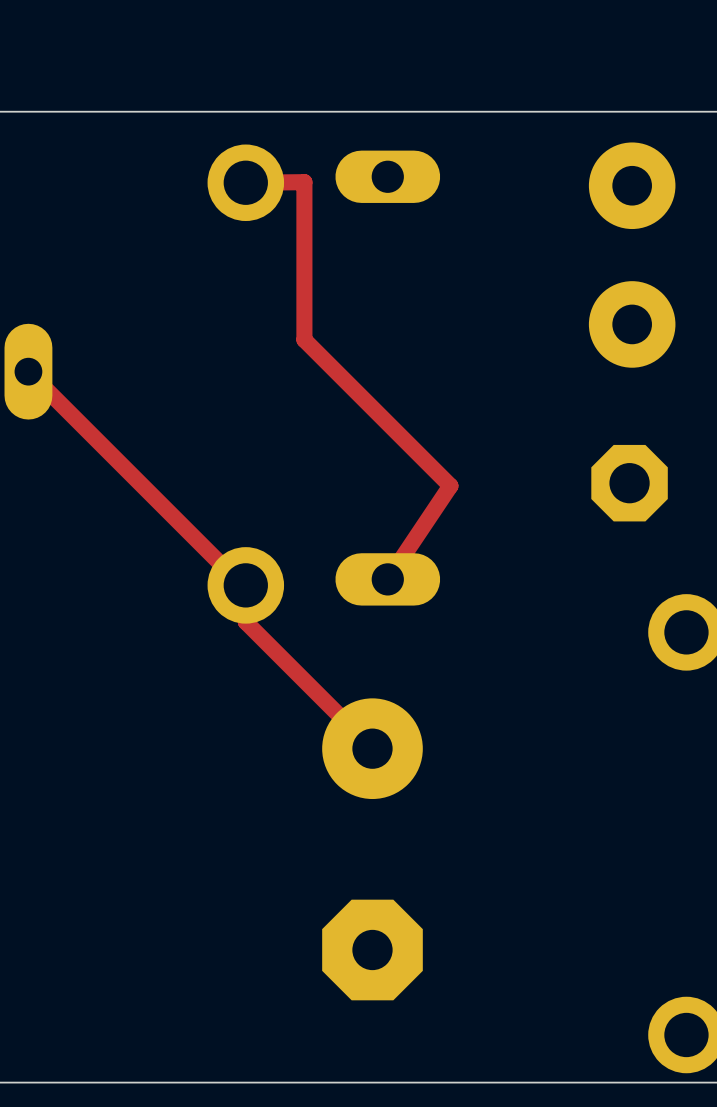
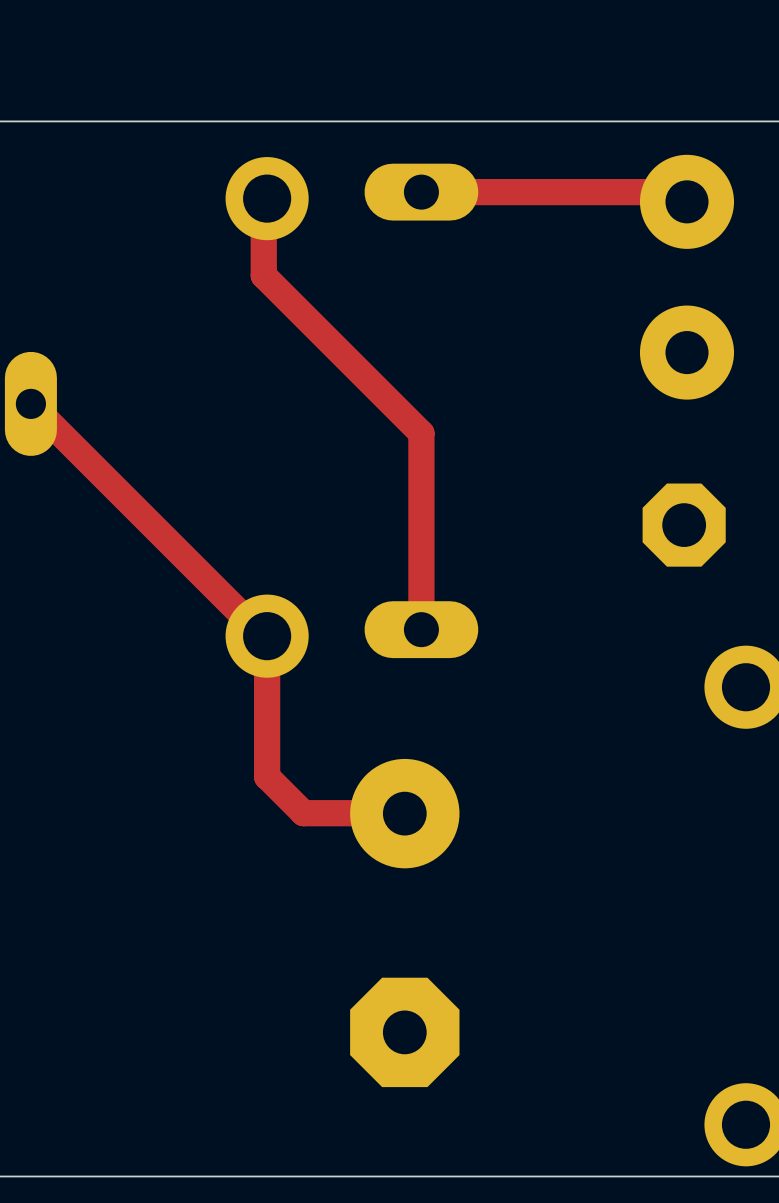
top track: none -> (421, 192) (677, 192) (687, 201)
top track: (245, 182) (304, 182) (304, 339) (450, 485) (387, 579) -> (267, 198) (263, 201) (263, 275) (421, 433) (421, 629)
top track width: thin (28, 371) (242, 585) (245, 585) (245, 621) -> thick (30, 403) (263, 636) (267, 636) (267, 675)
top track: (245, 621) (372, 748) -> (267, 675) (267, 776) (303, 813) (404, 813)

